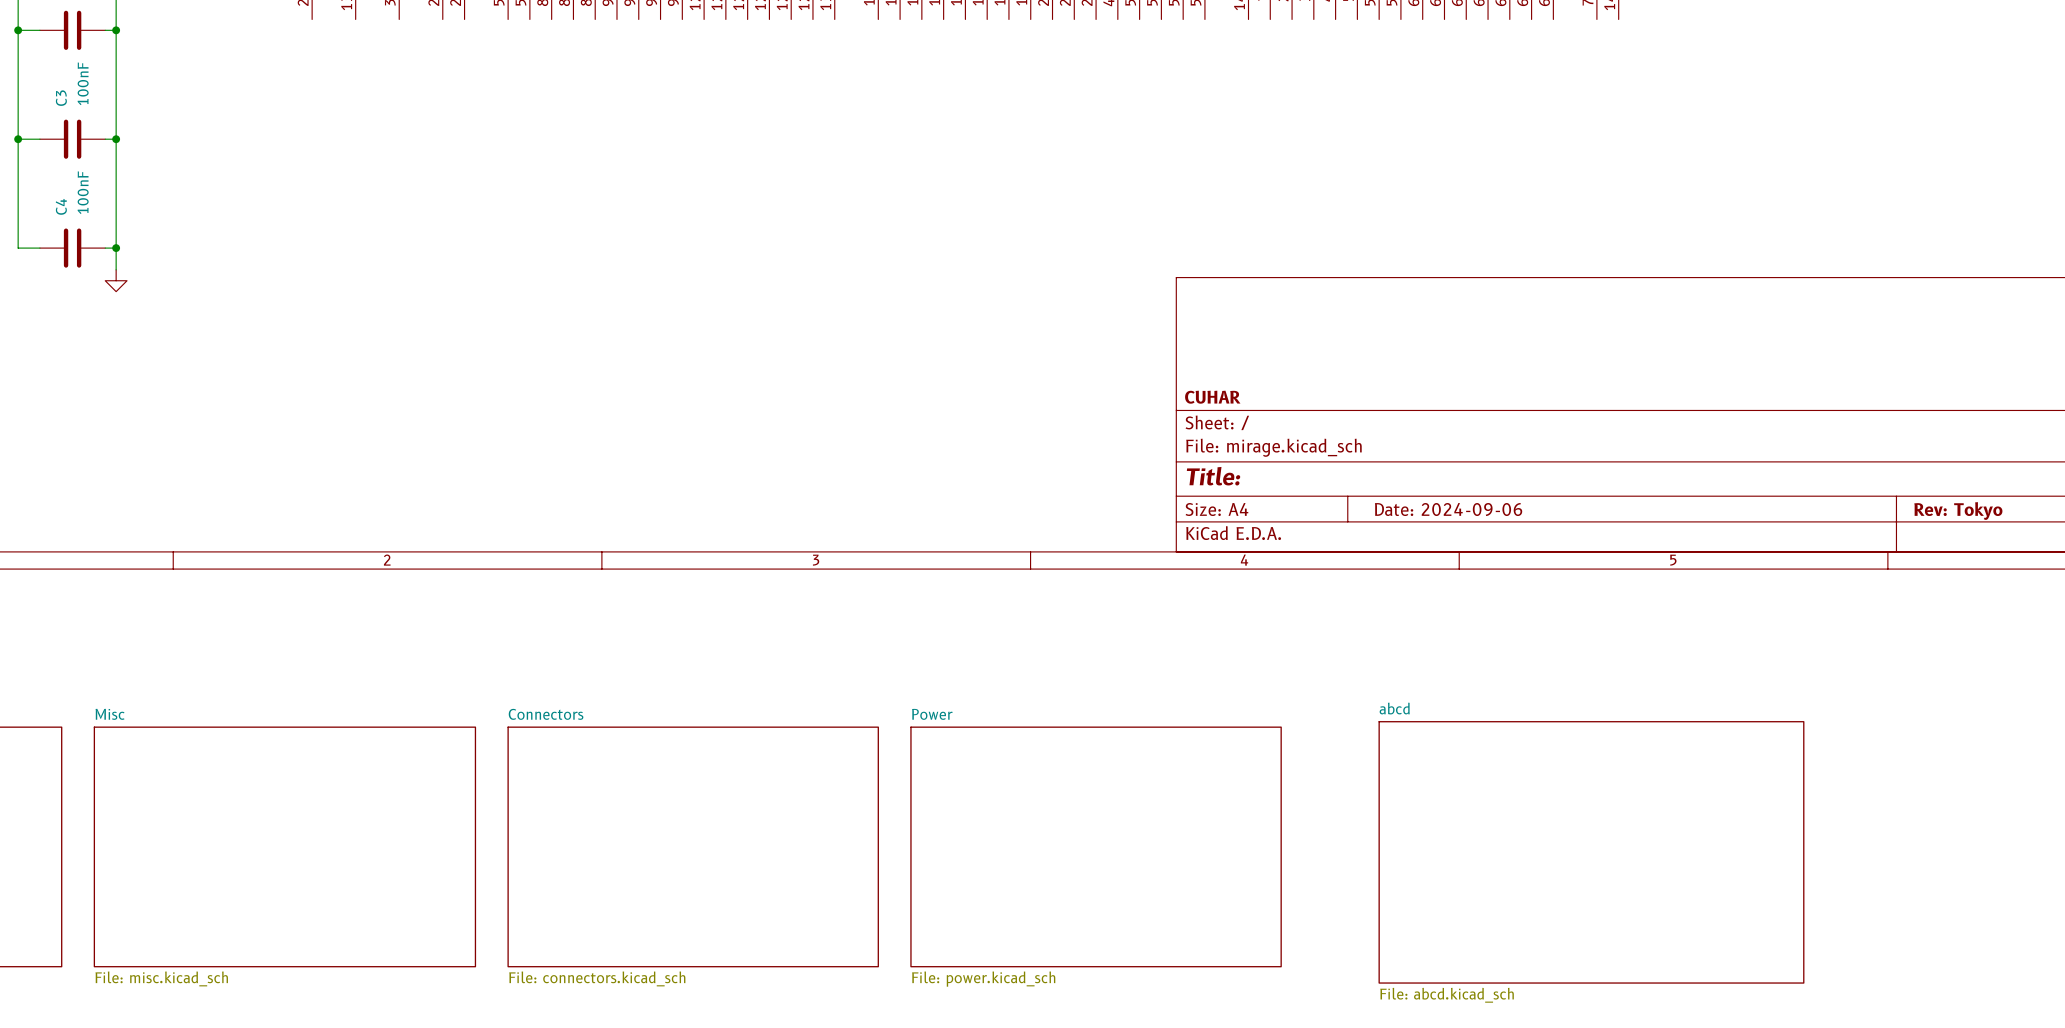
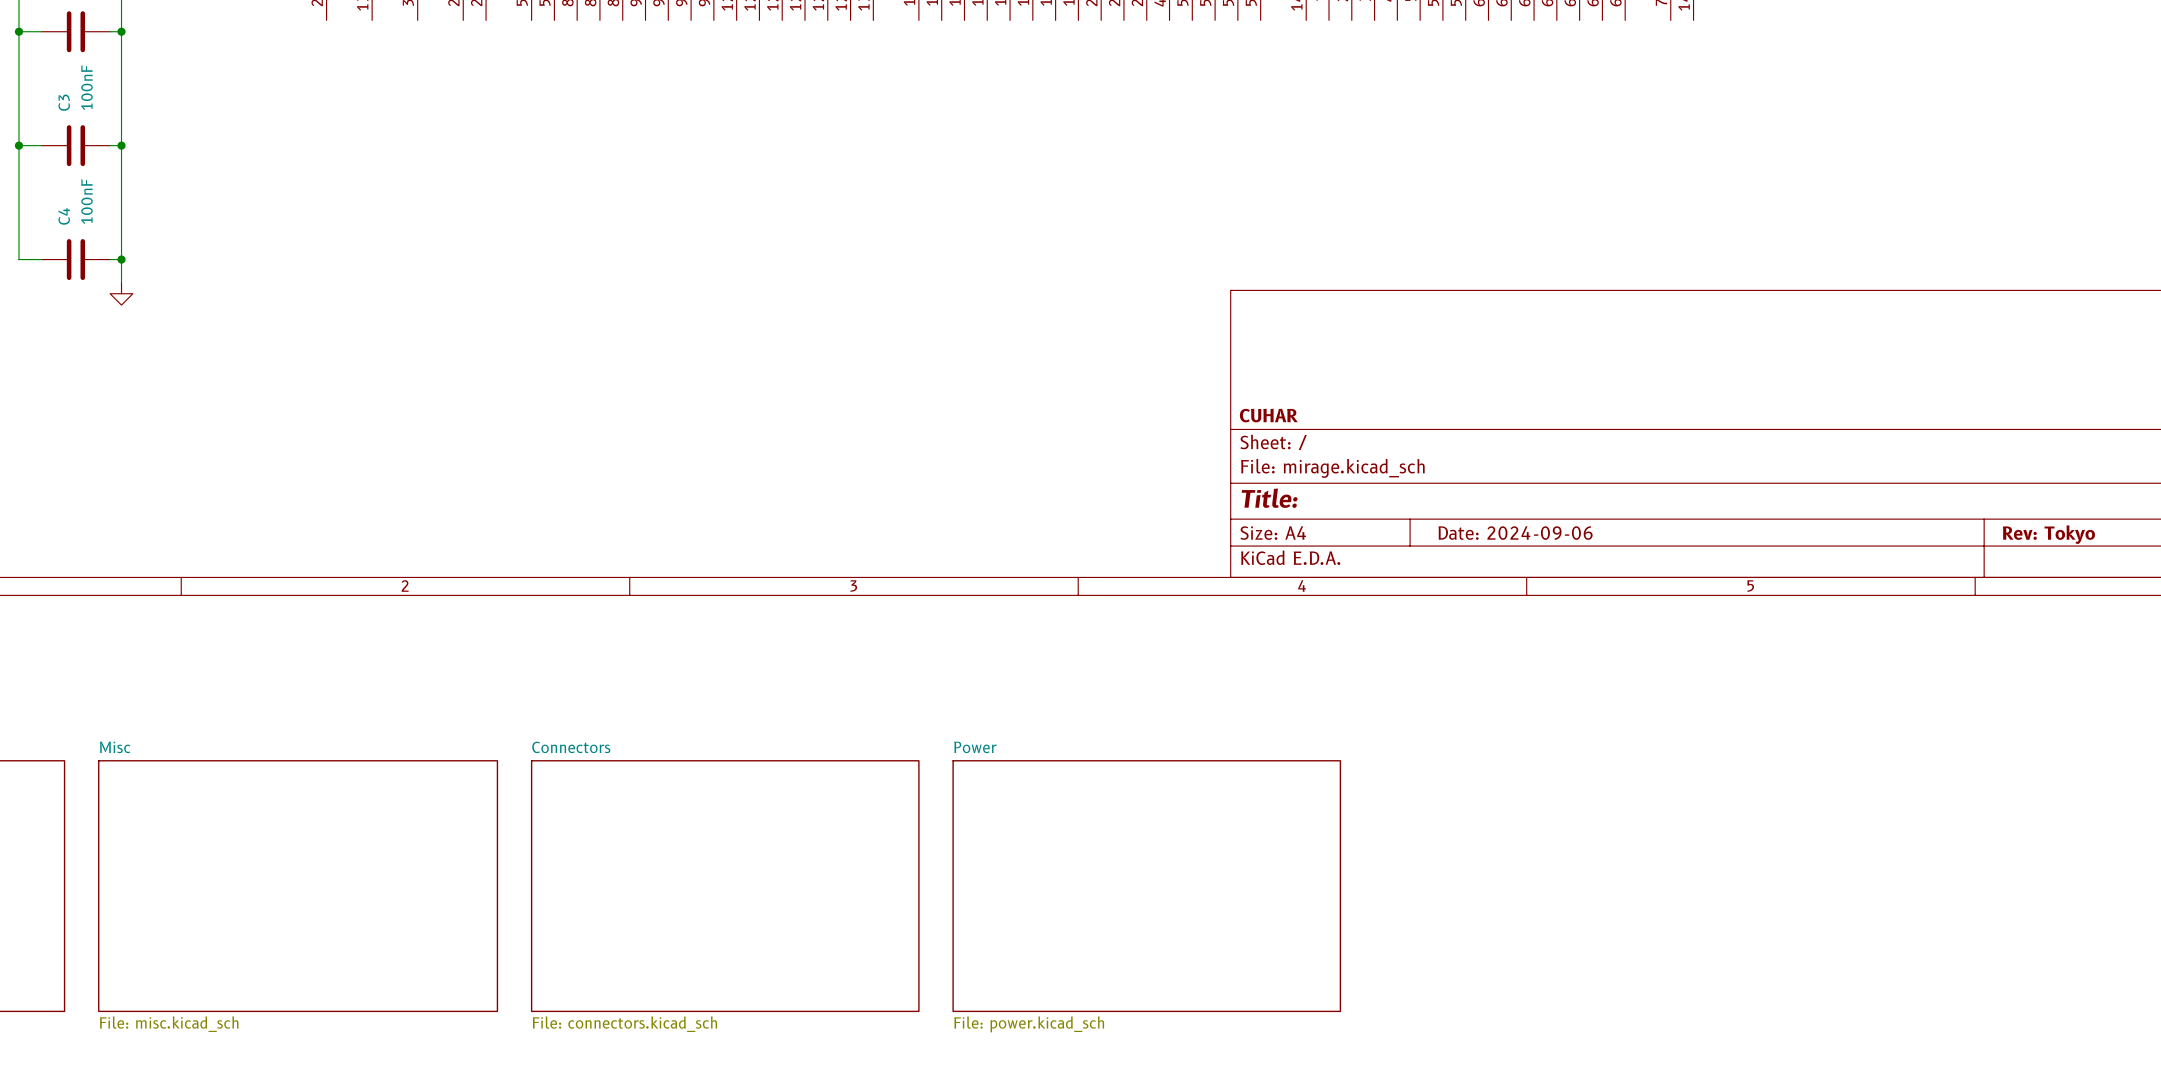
sheet abcd: File: abcd.kicad_sch (1591, 852) -> none

